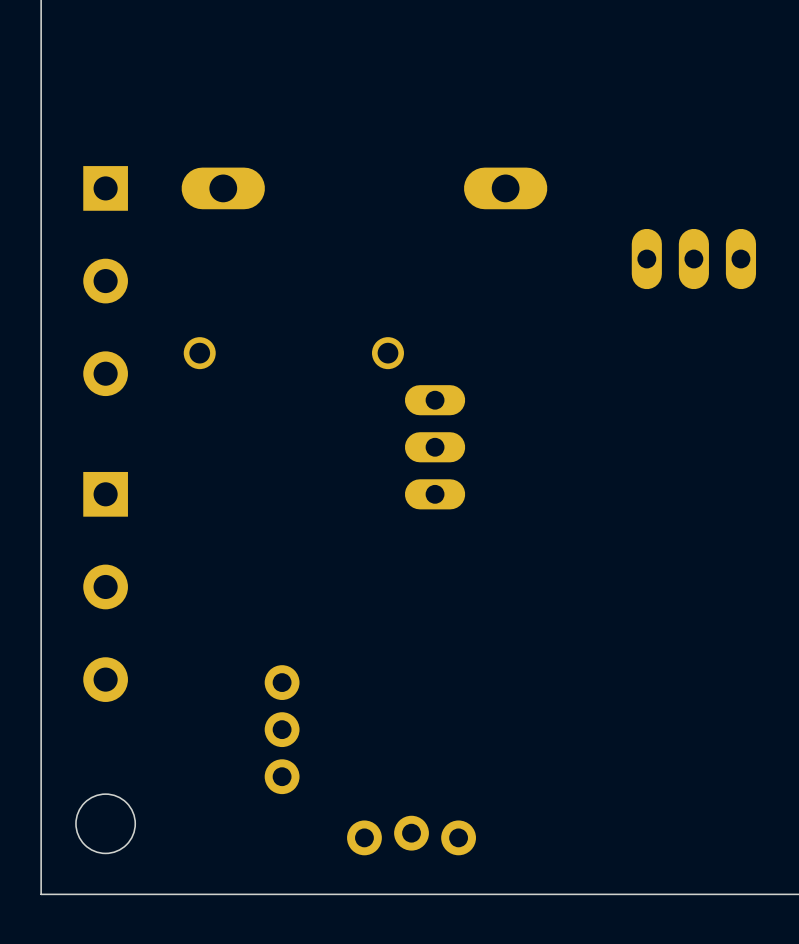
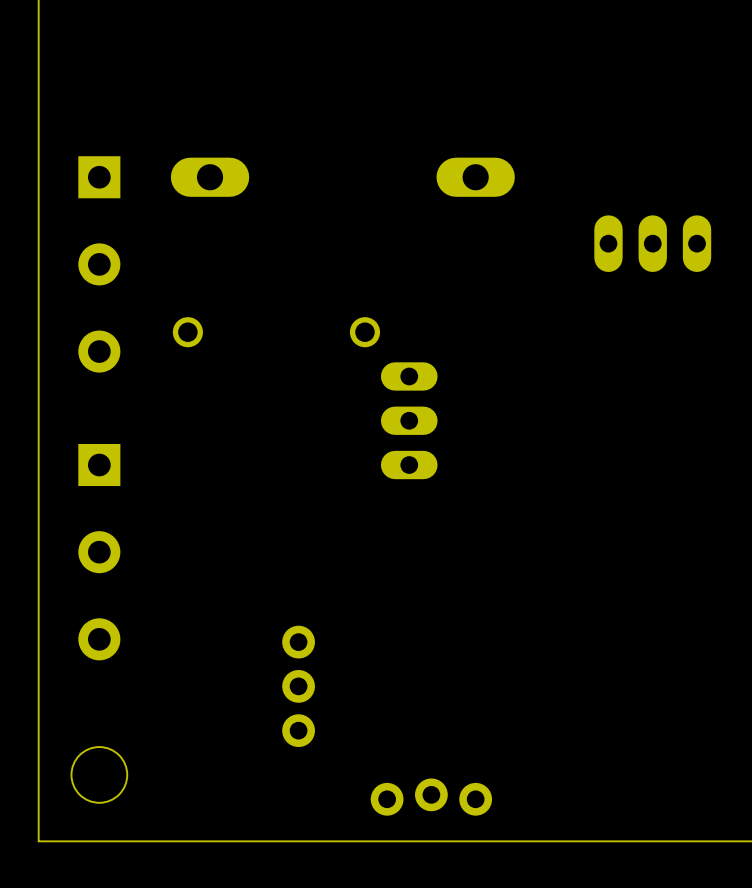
part position: (282, 729) -> (298, 686)
part position: (411, 835) -> (431, 797)

